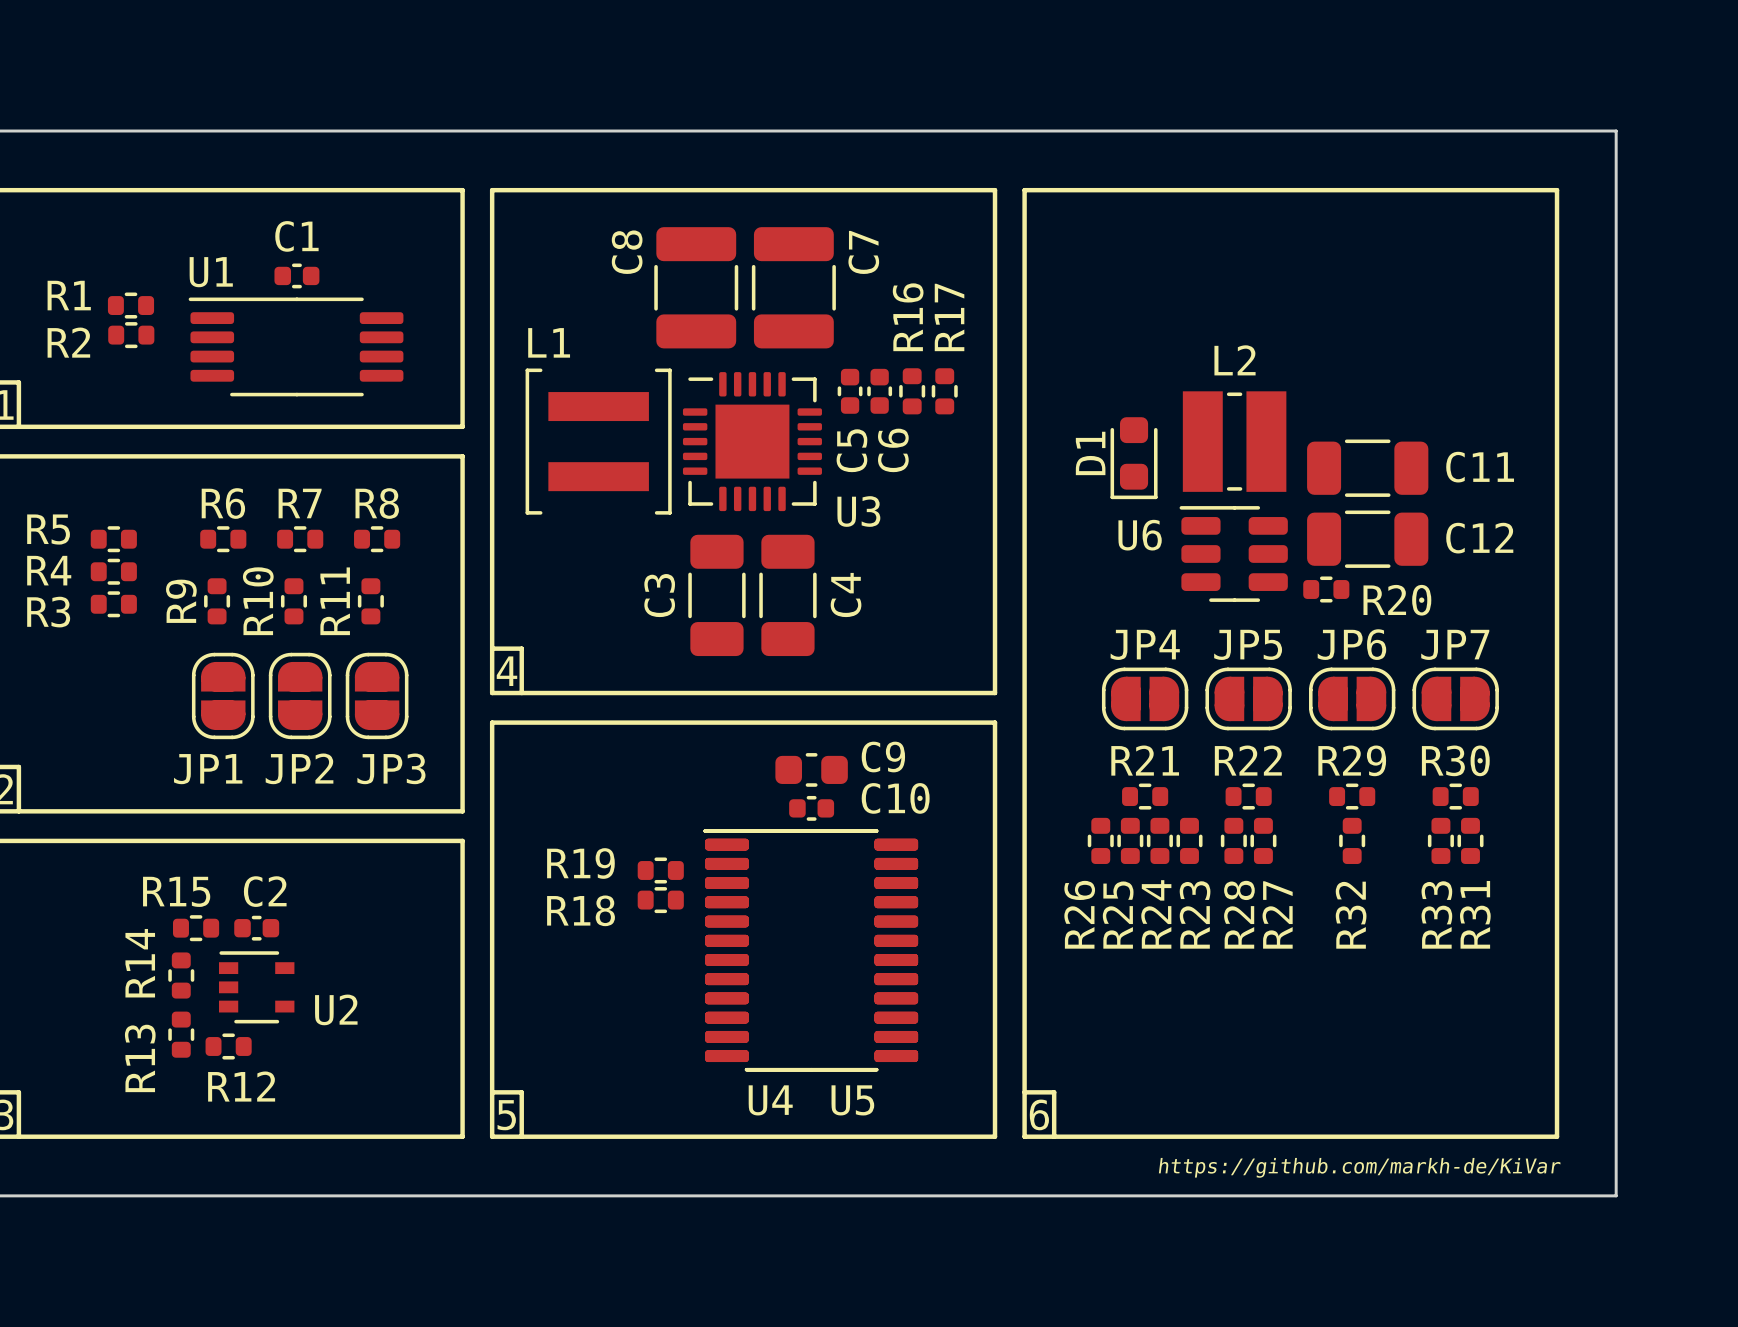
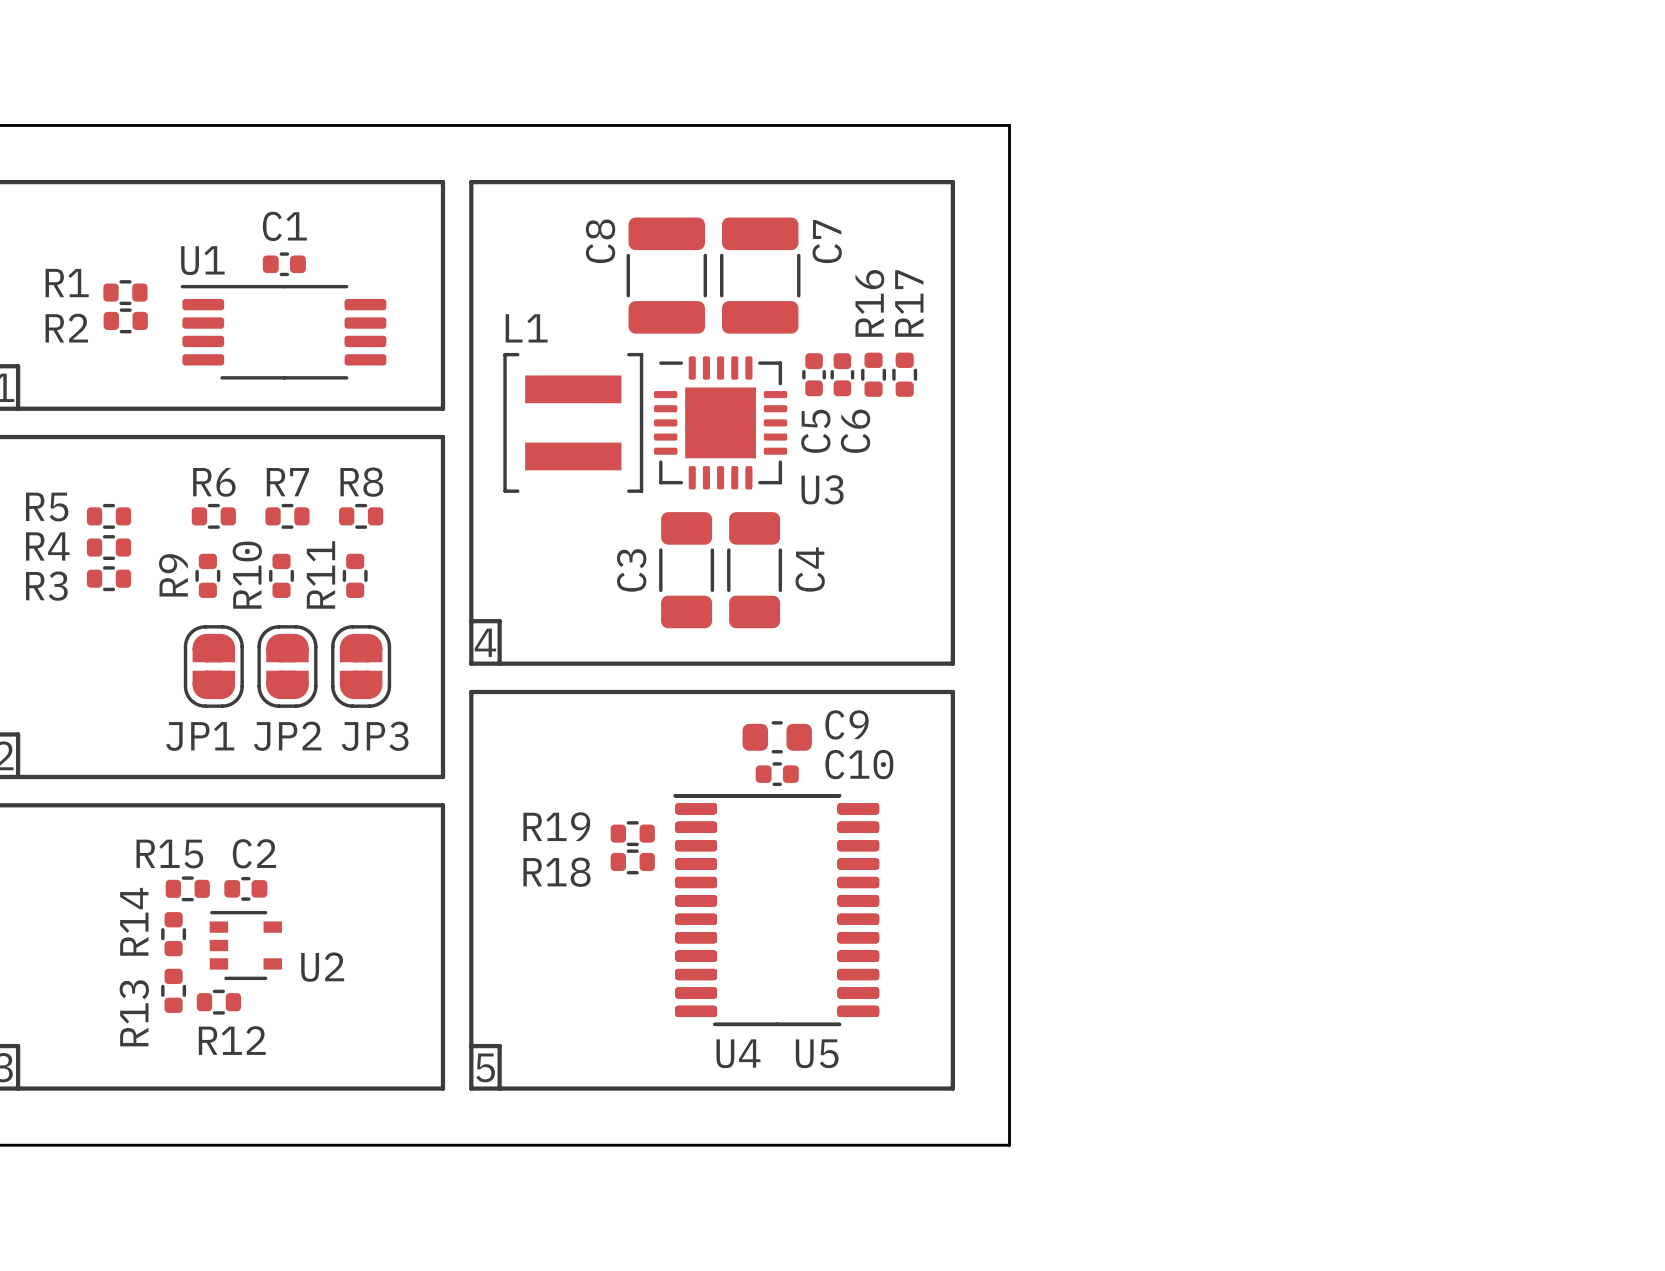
board edge: (1054, 131) (1616, 131) (1616, 1195) (1054, 1195) -> (1009, 125) (1009, 1145)
line: (1024, 190) (1557, 190) (1557, 1136) (1024, 1136) (1024, 190) -> none
L2: (1234, 441) -> none
D1: (1134, 458) -> none
C11: (1367, 468) -> none
C12: (1367, 539) -> none
U6: (1233, 554) -> none
R20: (1326, 589) -> none
JP4: (1145, 698) -> none
JP5: (1248, 698) -> none
JP6: (1352, 698) -> none
JP7: (1455, 698) -> none
R21: (1145, 796) -> none
R22: (1248, 796) -> none
R29: (1352, 796) -> none
R30: (1455, 796) -> none
R26: (1100, 840) -> none
R25: (1130, 840) -> none
R24: (1159, 840) -> none
R23: (1189, 840) -> none
R28: (1233, 840) -> none
R27: (1263, 840) -> none
R32: (1352, 840) -> none
R33: (1440, 840) -> none
R31: (1470, 840) -> none
line: (1024, 1092) (1054, 1092) (1054, 1136) -> none
text: 6 (1039, 1114) -> none
text: https://github.com/markh-de/KiVar (1359, 1167) -> none

